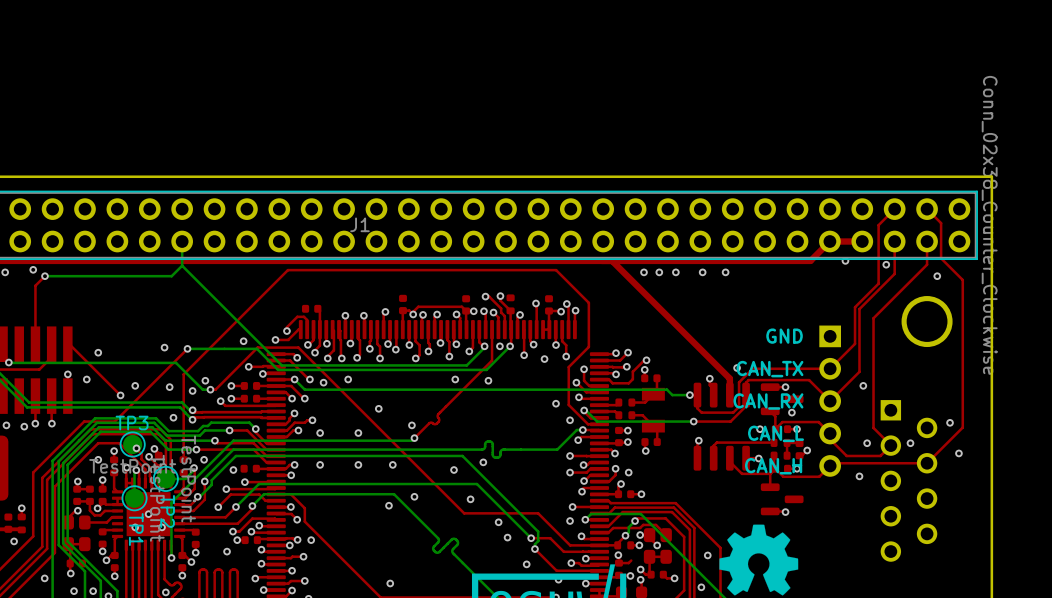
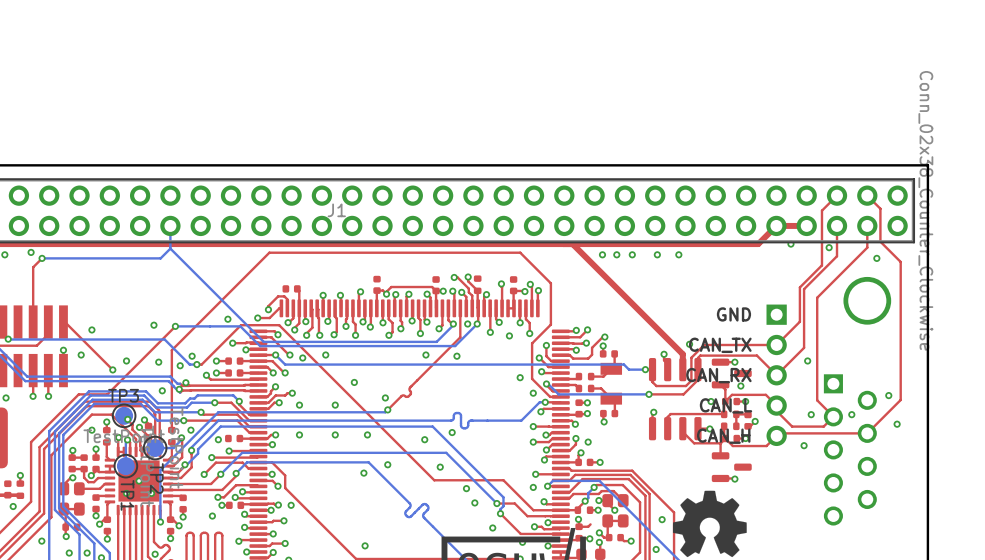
via: none -> (185, 382)
via: (192, 410) -> none
via: none -> (179, 389)
via: (192, 419) -> none
via: (24, 426) -> none

